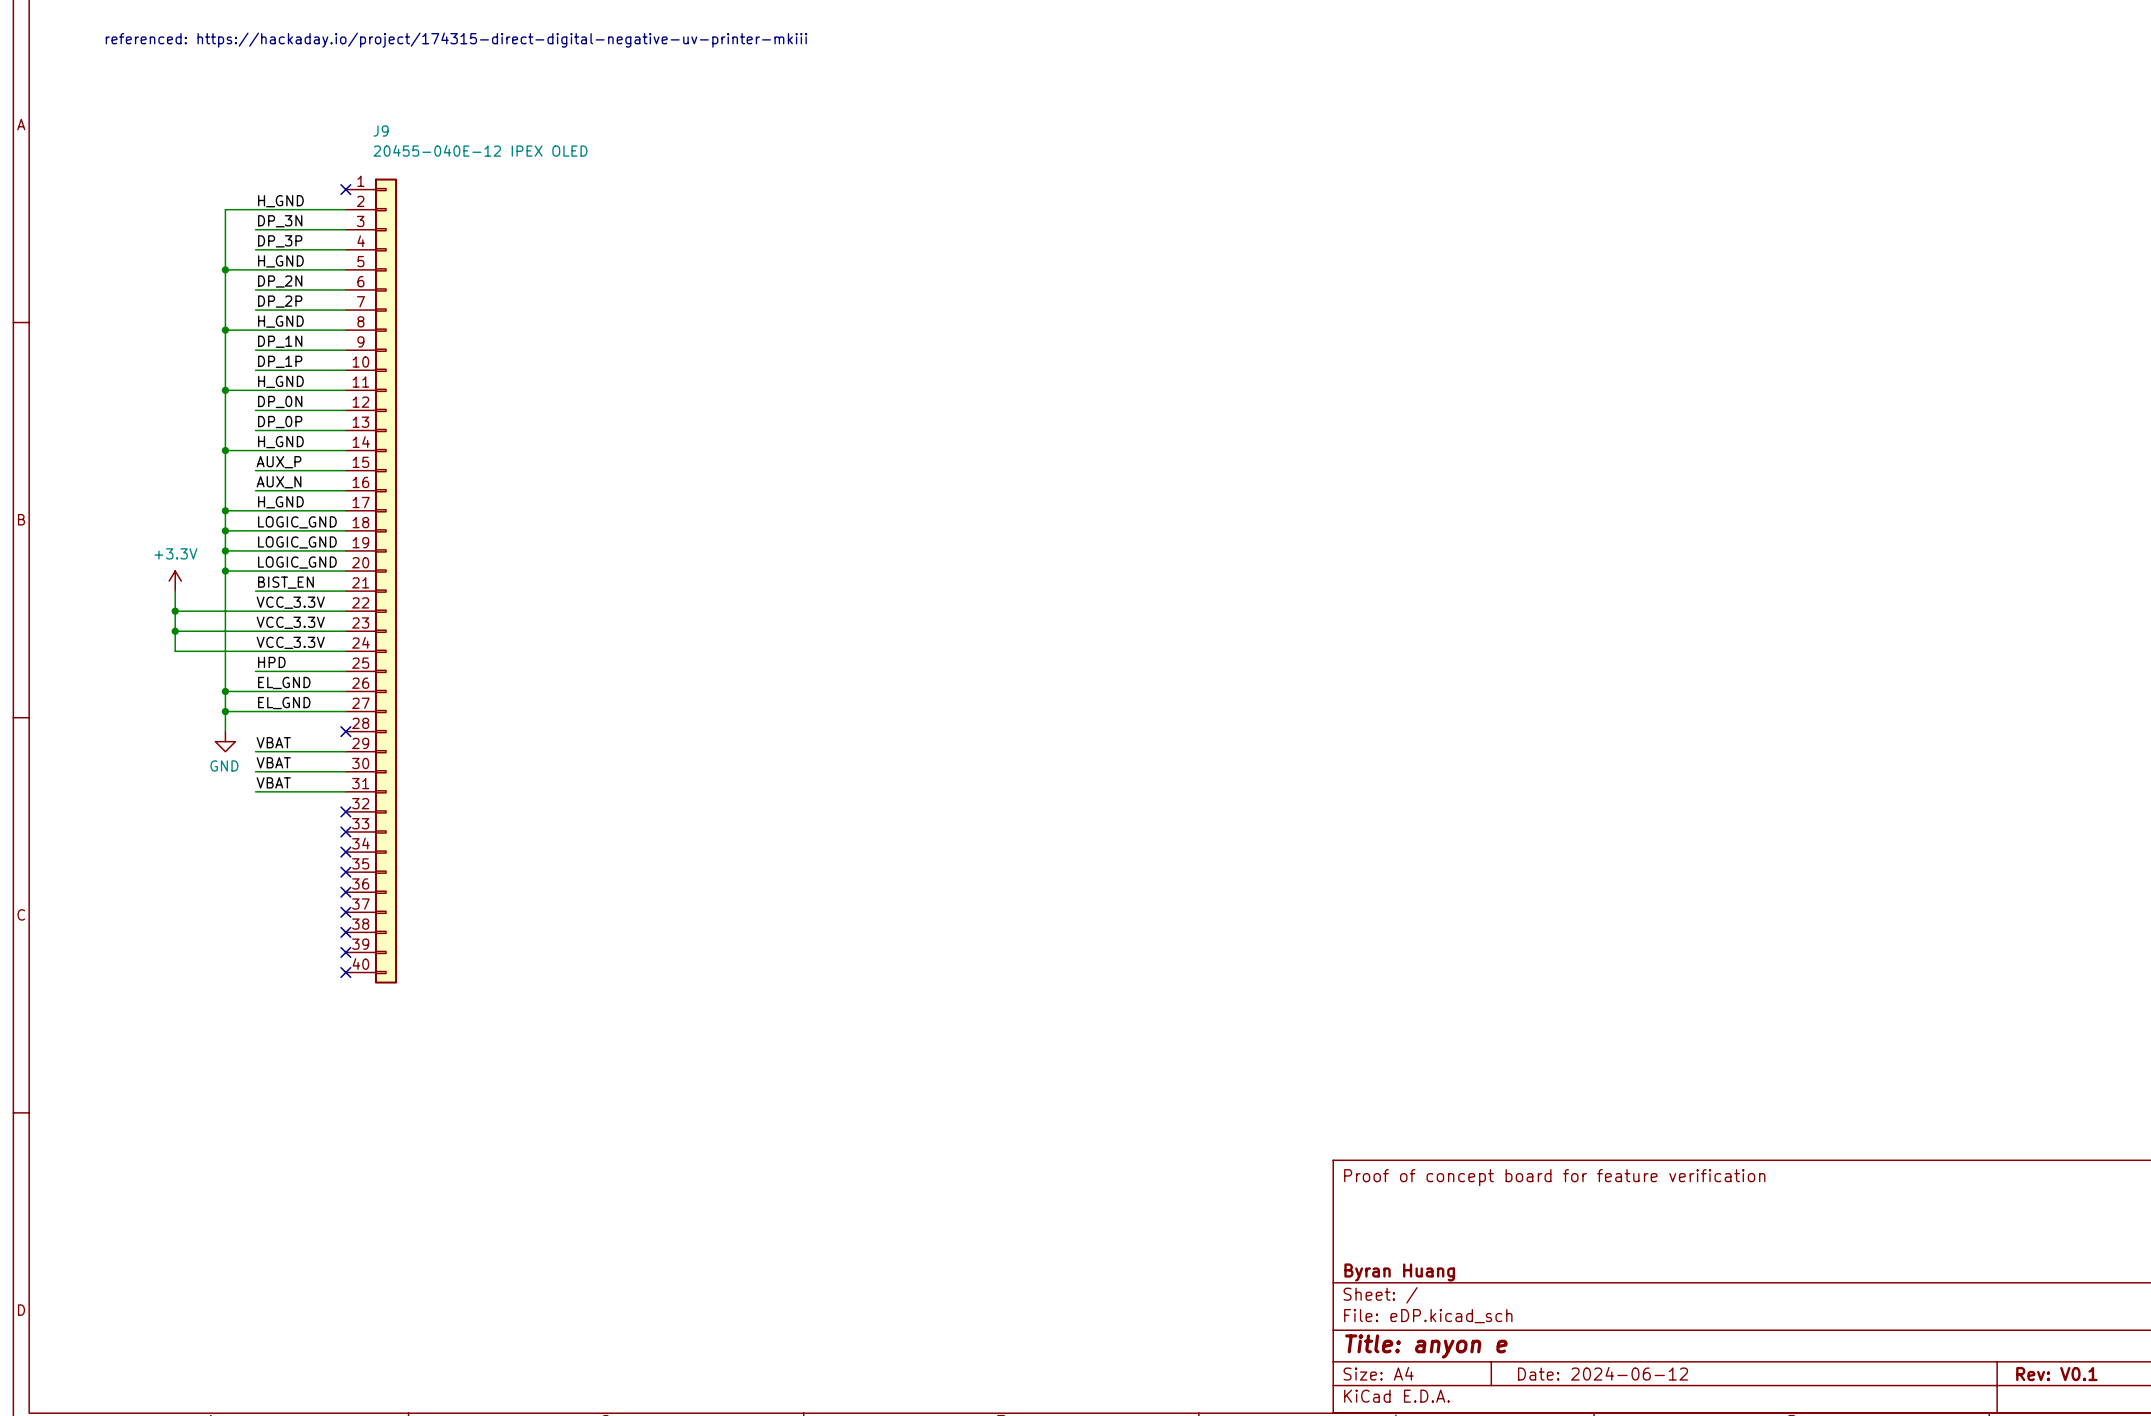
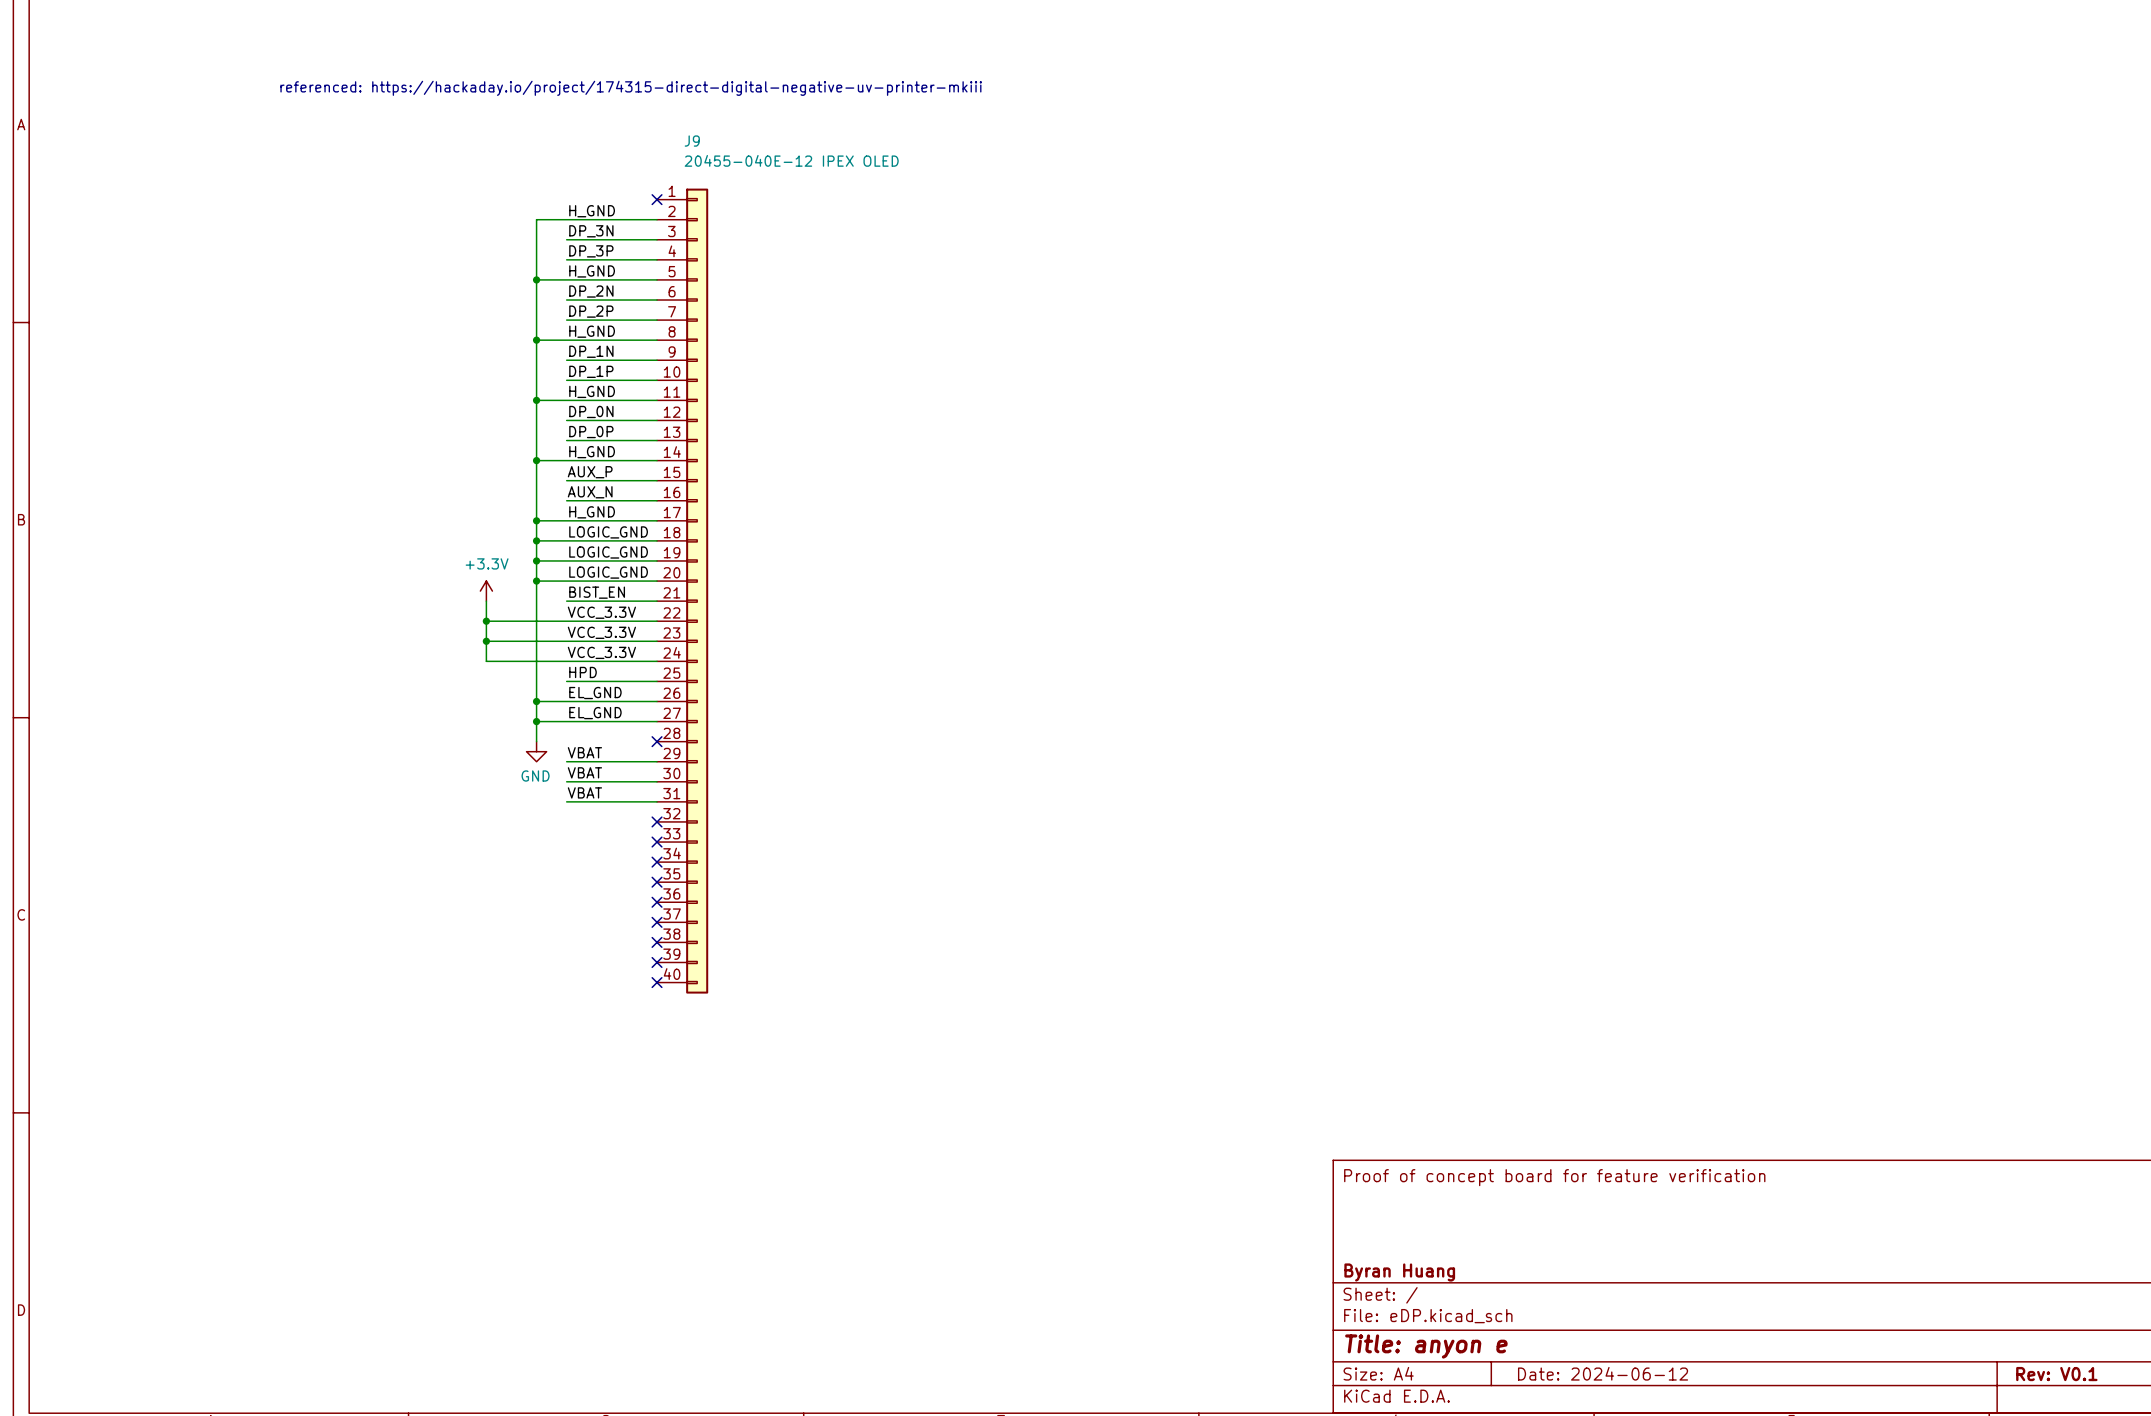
text position: referenced: https://hackaday.io/project/174315-direct-digital-negative-uv-printer-mkiii (456, 40) -> referenced: https://hackaday.io/project/174315-direct-digital-negative-uv-printer-mkiii (631, 88)
no-connect mark: (345, 189) -> none
no-connect mark: none -> (657, 199)
label: H_GND (280, 201) -> none
wire: (345, 209) (225, 209) (225, 731) -> none
label: none -> H_GND (592, 211)
wire: none -> (657, 219) (536, 219) (536, 741)
label: DP_3N (280, 221) -> none
wire: (255, 229) (345, 229) -> none
label: none -> DP_3N (591, 231)
wire: none -> (566, 239) (657, 239)
label: DP_3P (280, 241) -> none
wire: (255, 249) (345, 249) -> none
label: none -> DP_3P (591, 251)
wire: none -> (566, 259) (657, 259)
label: H_GND (280, 261) -> none
wire: (225, 269) (345, 269) -> none
junction: (225, 269) -> none
label: none -> H_GND (592, 271)
wire: none -> (536, 279) (657, 279)
junction: none -> (536, 279)
label: DP_2N (280, 281) -> none
wire: (255, 289) (345, 289) -> none
label: none -> DP_2N (591, 291)
wire: none -> (566, 300) (657, 300)
label: DP_2P (280, 301) -> none
wire: (255, 310) (345, 310) -> none
label: none -> DP_2P (591, 311)
wire: none -> (566, 320) (657, 320)
label: H_GND (280, 321) -> none
wire: (225, 330) (345, 330) -> none
junction: (225, 330) -> none
label: none -> H_GND (592, 331)
wire: none -> (536, 340) (657, 340)
junction: none -> (536, 340)
label: DP_1N (280, 341) -> none
wire: (255, 350) (345, 350) -> none
label: none -> DP_1N (591, 351)
wire: none -> (566, 360) (657, 360)
label: DP_1P (280, 361) -> none
wire: (255, 370) (345, 370) -> none
label: none -> DP_1P (591, 371)
wire: none -> (566, 380) (657, 380)
label: H_GND (280, 381) -> none
wire: (225, 390) (345, 390) -> none
junction: (225, 390) -> none
label: none -> H_GND (592, 391)
wire: none -> (536, 400) (657, 400)
junction: none -> (536, 400)
label: DP_0N (280, 401) -> none
wire: (255, 410) (345, 410) -> none
label: none -> DP_0N (591, 411)
wire: none -> (566, 420) (657, 420)
label: DP_0P (280, 422) -> none
wire: (255, 430) (345, 430) -> none
label: none -> DP_0P (591, 432)
wire: none -> (566, 440) (657, 440)
label: H_GND (280, 442) -> none
wire: (225, 450) (345, 450) -> none
junction: (225, 450) -> none
label: none -> H_GND (592, 452)
wire: none -> (536, 460) (657, 460)
junction: none -> (536, 460)
label: AUX_P (279, 462) -> none
wire: (255, 470) (345, 470) -> none
label: none -> AUX_P (590, 472)
wire: none -> (566, 480) (657, 480)
label: AUX_N (279, 482) -> none
wire: (255, 490) (345, 490) -> none
label: none -> AUX_N (590, 492)
wire: none -> (566, 500) (657, 500)
label: H_GND (280, 502) -> none
wire: (225, 510) (345, 510) -> none
junction: (225, 510) -> none
label: none -> H_GND (592, 512)
wire: none -> (536, 520) (657, 520)
junction: none -> (536, 520)
label: LOGIC_GND (297, 522) -> none
wire: (225, 530) (345, 530) -> none
junction: (225, 530) -> none
label: none -> LOGIC_GND (608, 532)
wire: none -> (536, 540) (657, 540)
junction: none -> (536, 540)
label: LOGIC_GND (297, 542) -> none
wire: (225, 550) (345, 550) -> none
junction: (225, 550) -> none
label: none -> LOGIC_GND (608, 552)
wire: none -> (536, 560) (657, 560)
junction: none -> (536, 560)
label: LOGIC_GND (297, 562) -> none
wire: (225, 571) (345, 571) -> none
junction: (225, 571) -> none
label: none -> LOGIC_GND (608, 572)
power symbol: +3.3V (175, 581) -> none
J9 position: (371, 581) -> (682, 591)
wire: none -> (536, 581) (657, 581)
junction: none -> (536, 581)
label: BIST_EN (285, 582) -> none
wire: (175, 591) (175, 651) (345, 651) -> none
wire: (255, 591) (345, 591) -> none
power symbol: none -> +3.3V (486, 591)
label: none -> BIST_EN (597, 592)
wire: none -> (486, 601) (486, 661) (657, 661)
wire: none -> (566, 601) (657, 601)
label: VCC_3.3V (290, 602) -> none
wire: (175, 611) (345, 611) -> none
junction: (175, 611) -> none
label: none -> VCC_3.3V (601, 612)
wire: none -> (486, 621) (657, 621)
junction: none -> (486, 621)
label: VCC_3.3V (290, 622) -> none
wire: (175, 631) (345, 631) -> none
junction: (175, 631) -> none
label: none -> VCC_3.3V (601, 632)
wire: none -> (486, 641) (657, 641)
junction: none -> (486, 641)
label: VCC_3.3V (290, 642) -> none
label: none -> VCC_3.3V (601, 652)
label: HPD (271, 662) -> none
wire: (255, 671) (345, 671) -> none
label: none -> HPD (583, 672)
wire: none -> (566, 681) (657, 681)
label: EL_GND (284, 682) -> none
wire: (225, 691) (345, 691) -> none
junction: (225, 691) -> none
label: none -> EL_GND (595, 693)
wire: none -> (536, 701) (657, 701)
junction: none -> (536, 701)
label: EL_GND (284, 703) -> none
wire: (225, 711) (345, 711) -> none
junction: (225, 711) -> none
label: none -> EL_GND (595, 713)
wire: none -> (536, 721) (657, 721)
junction: none -> (536, 721)
no-connect mark: (345, 731) -> none
power symbol: GND (225, 741) -> none
no-connect mark: none -> (657, 741)
label: VBAT (273, 742) -> none
wire: (255, 751) (345, 751) -> none
power symbol: none -> GND (536, 751)
label: none -> VBAT (584, 752)
wire: none -> (566, 761) (657, 761)
label: VBAT (273, 762) -> none
wire: (255, 771) (345, 771) -> none
label: none -> VBAT (584, 772)
wire: none -> (566, 781) (657, 781)
label: VBAT (273, 782) -> none
wire: (255, 791) (345, 791) -> none
label: none -> VBAT (584, 792)
wire: none -> (566, 801) (657, 801)
no-connect mark: (345, 811) -> none
no-connect mark: none -> (657, 821)
no-connect mark: (345, 831) -> none
no-connect mark: none -> (657, 842)
no-connect mark: (345, 852) -> none
no-connect mark: none -> (657, 862)
no-connect mark: (345, 872) -> none
no-connect mark: none -> (657, 882)
no-connect mark: (345, 892) -> none
no-connect mark: none -> (657, 902)
no-connect mark: (345, 912) -> none
no-connect mark: none -> (657, 922)
no-connect mark: (345, 932) -> none
no-connect mark: none -> (657, 942)
no-connect mark: (345, 952) -> none
no-connect mark: none -> (657, 962)
no-connect mark: (345, 972) -> none
no-connect mark: none -> (657, 982)

